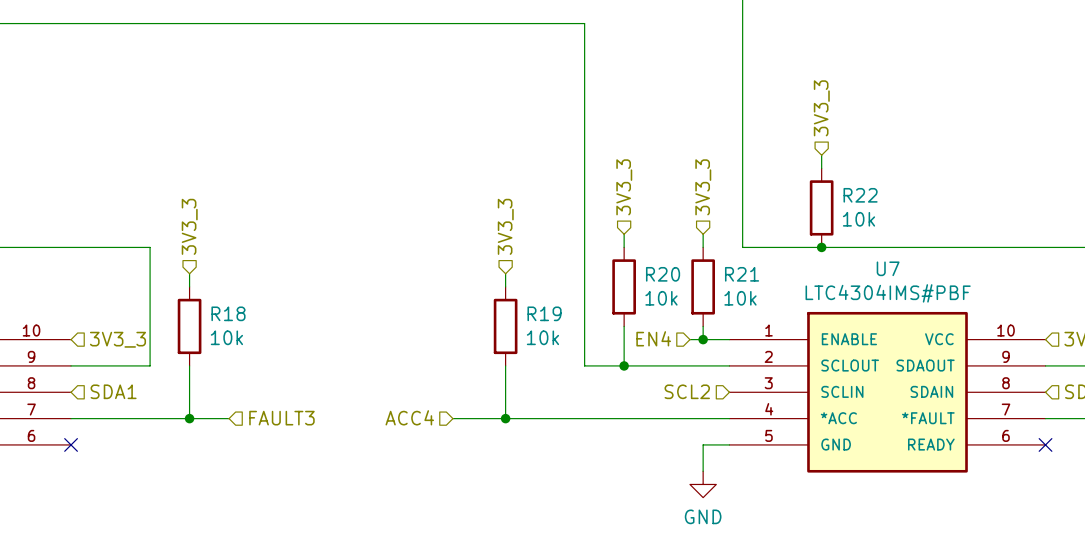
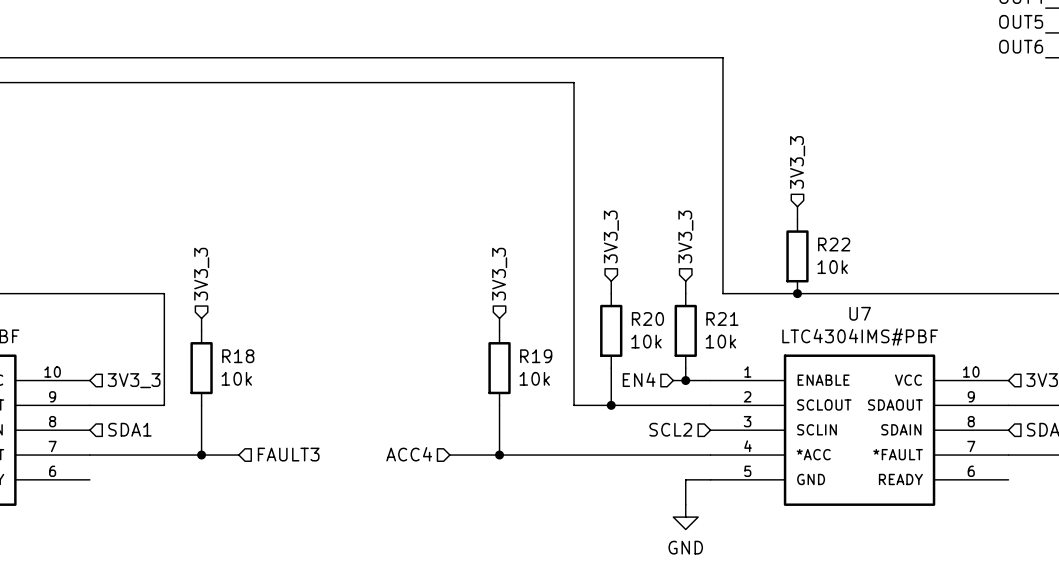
no-connect mark: (71, 444) -> none
no-connect mark: (1045, 444) -> none

